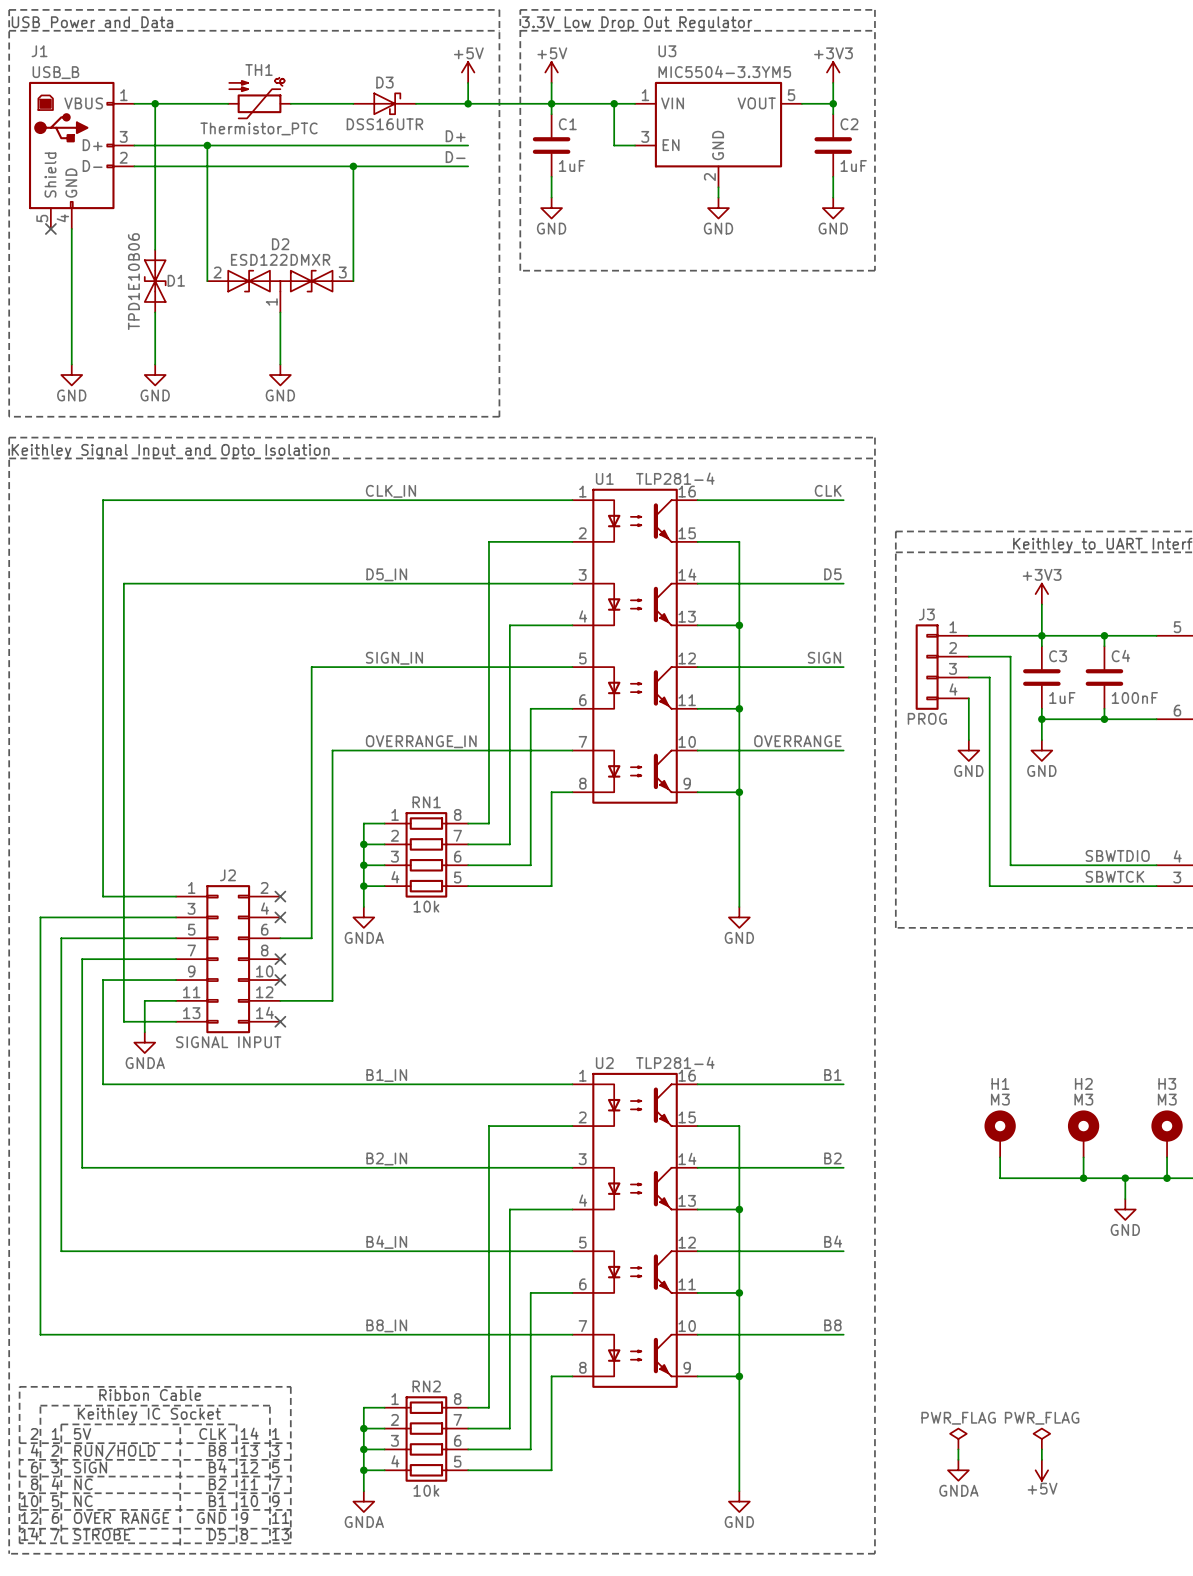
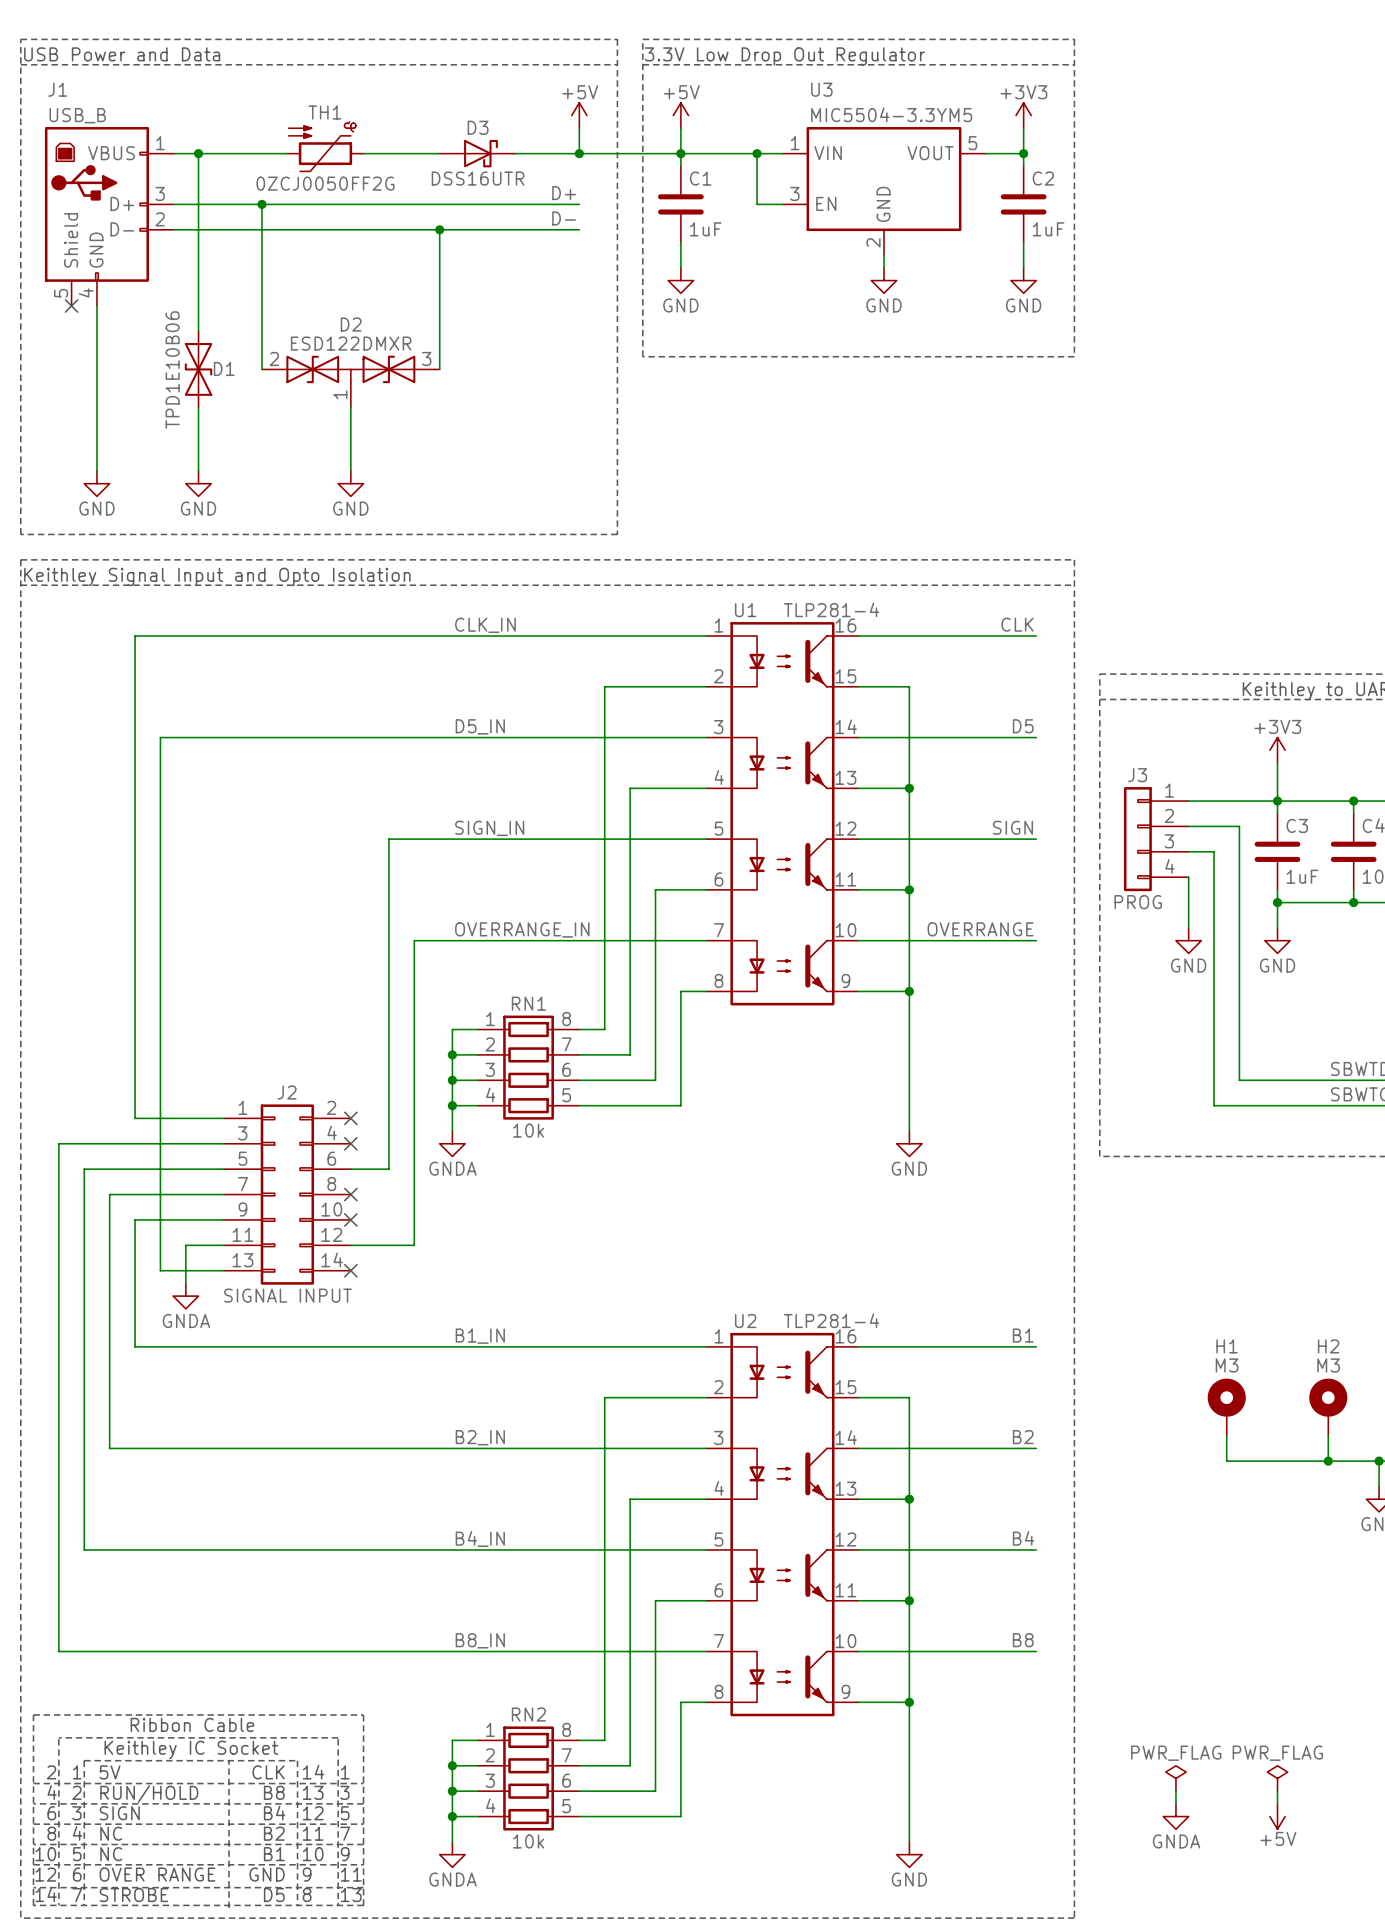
TH1 value: Thermistor_PTC (259, 128) -> 0ZCJ0050FF2G (325, 183)

